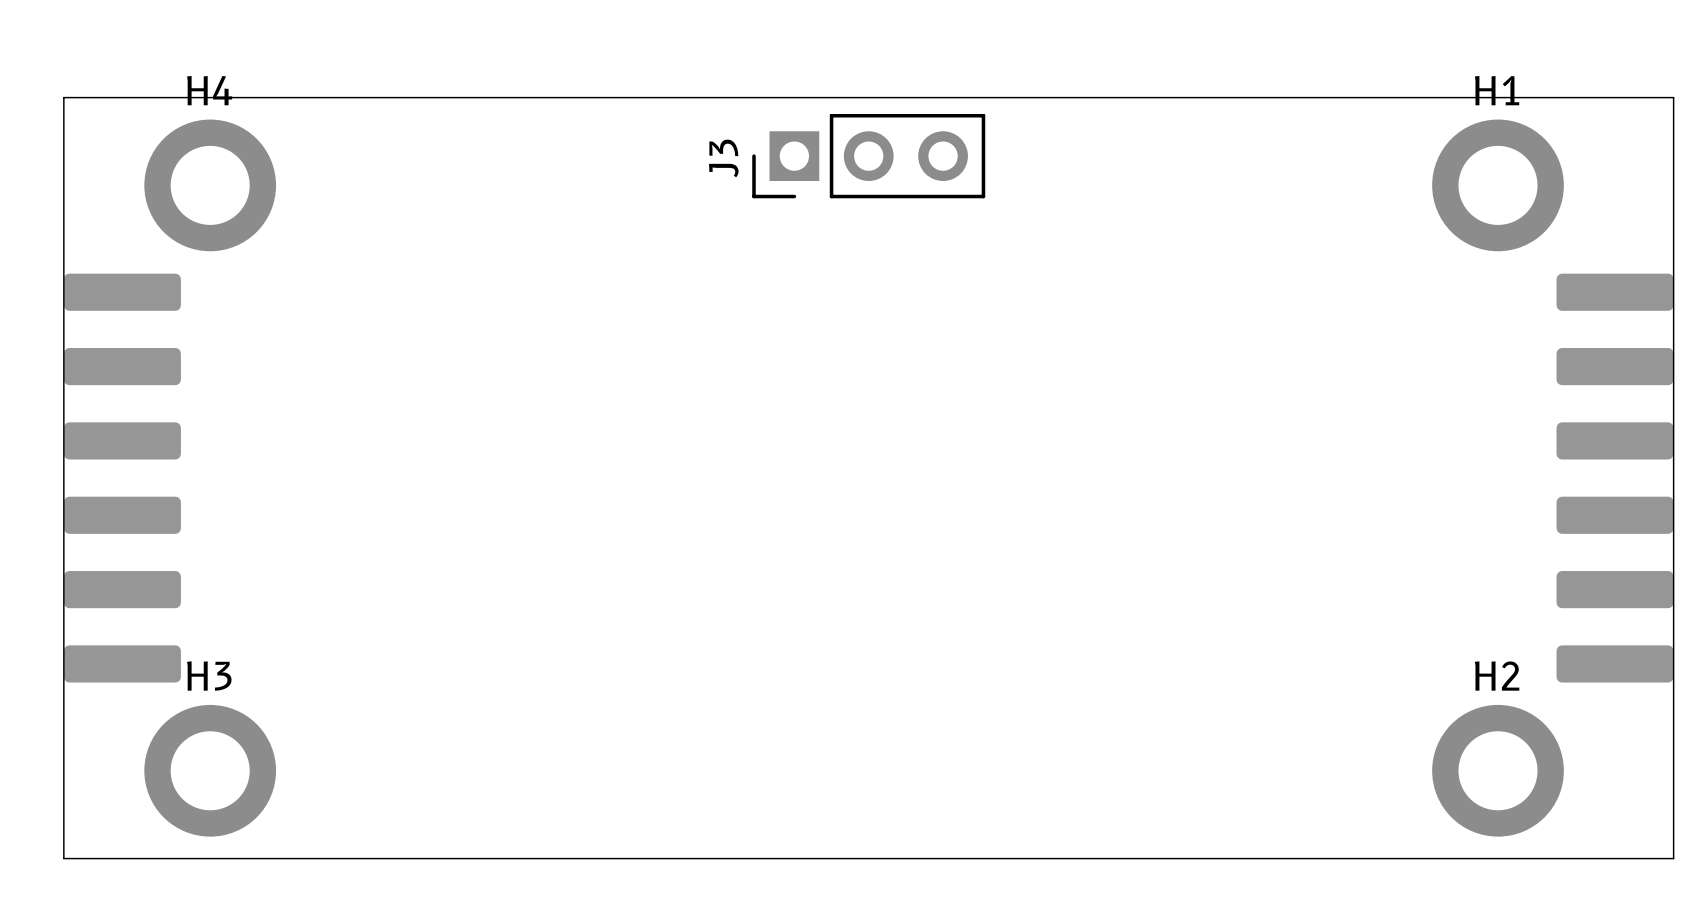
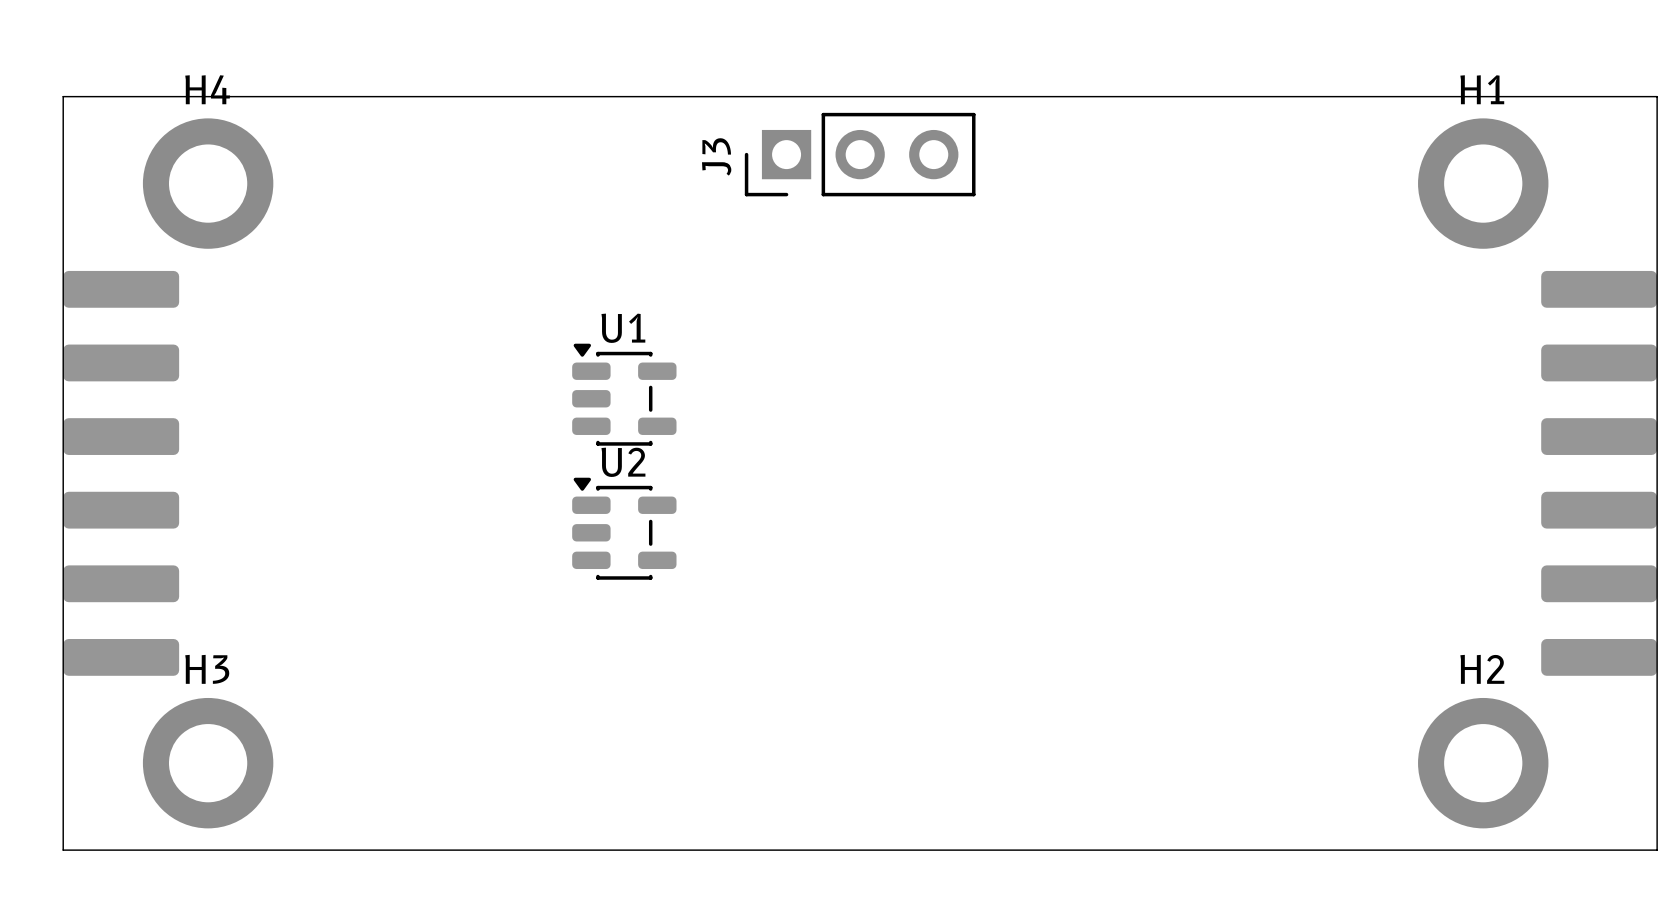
U1: none -> (624, 394)
U2: none -> (624, 528)

